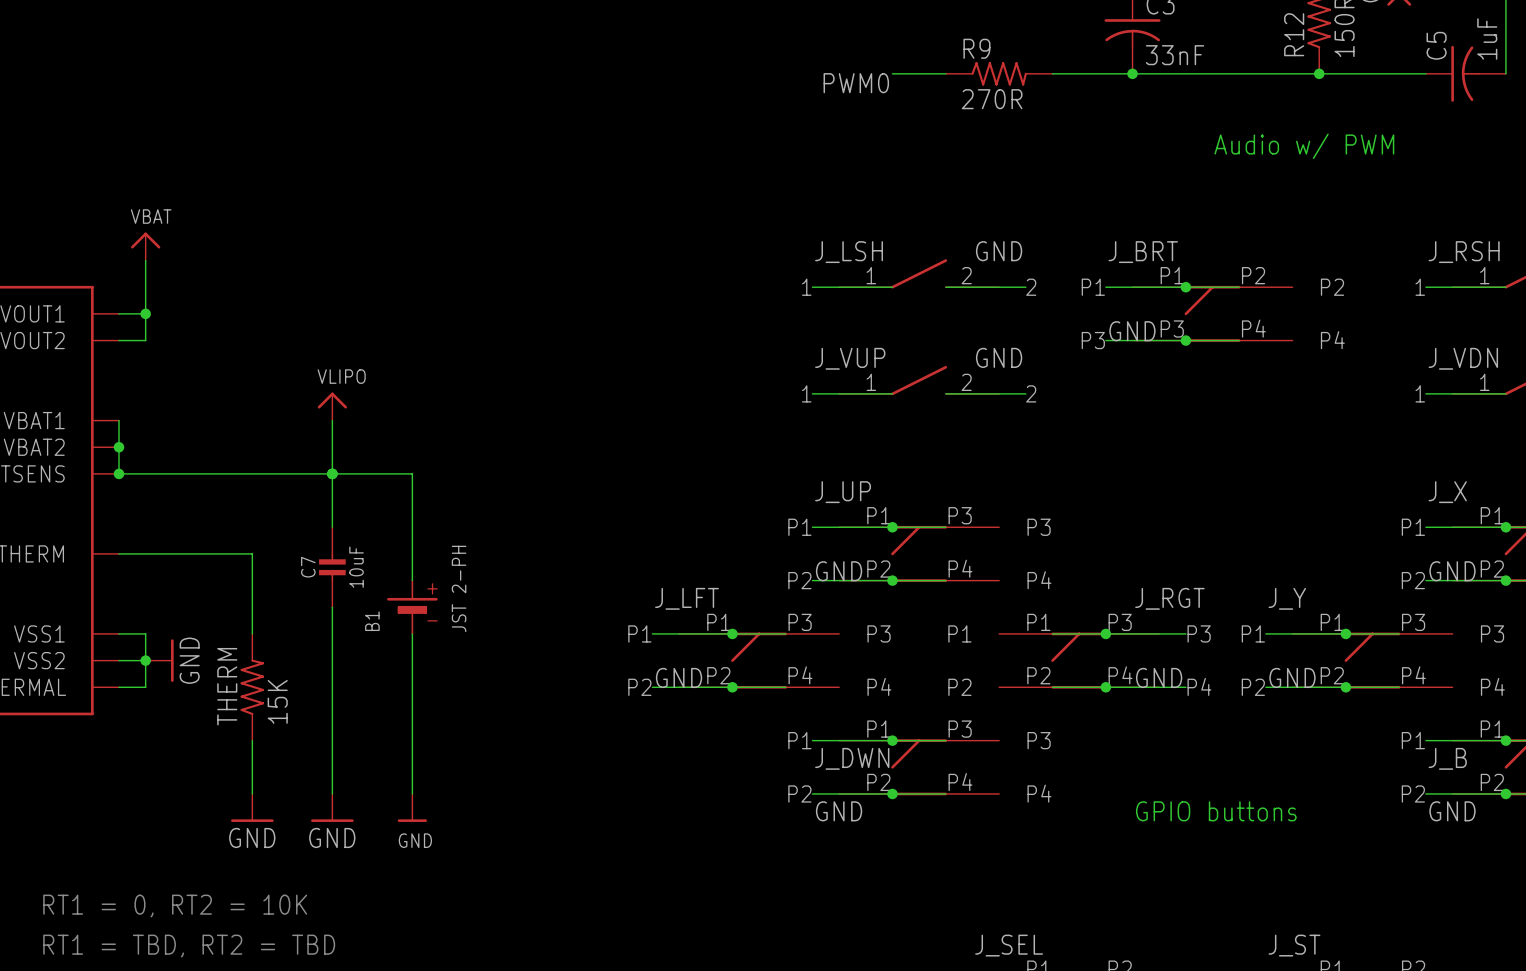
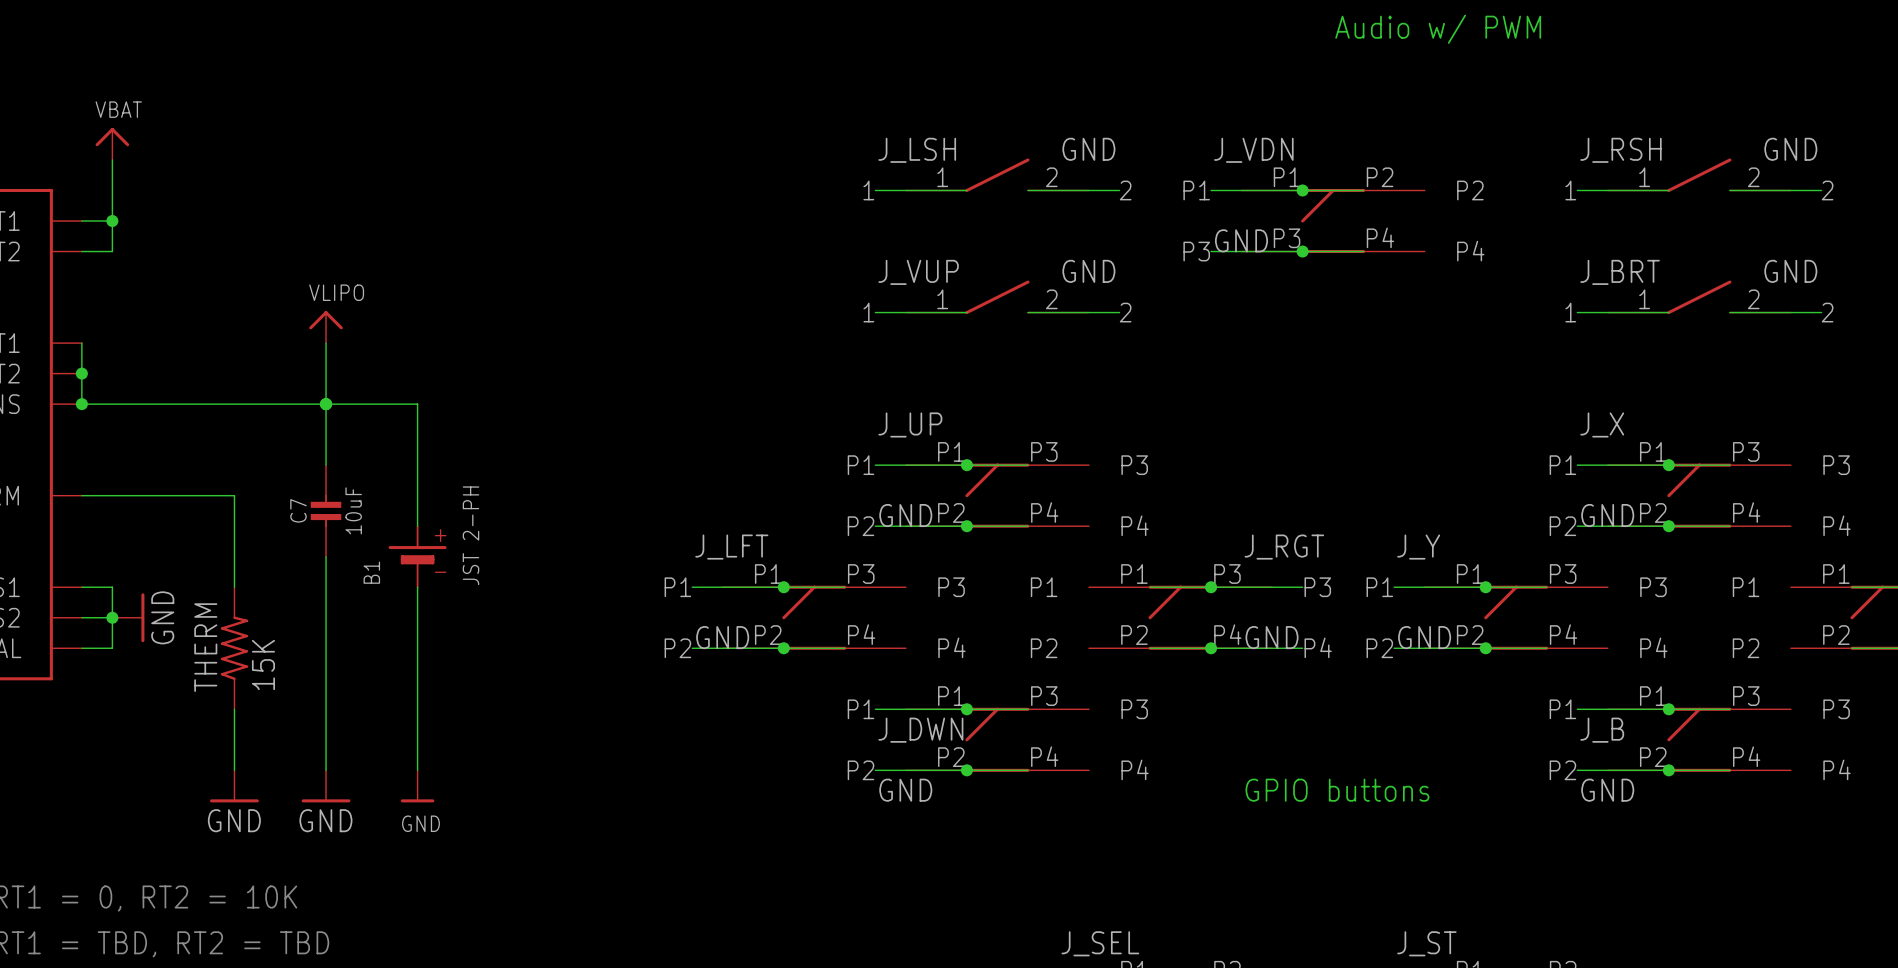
label: J_BRT (1143, 252) -> J_VDN (1253, 150)
label: J_VDN (1463, 358) -> J_BRT (1620, 272)

